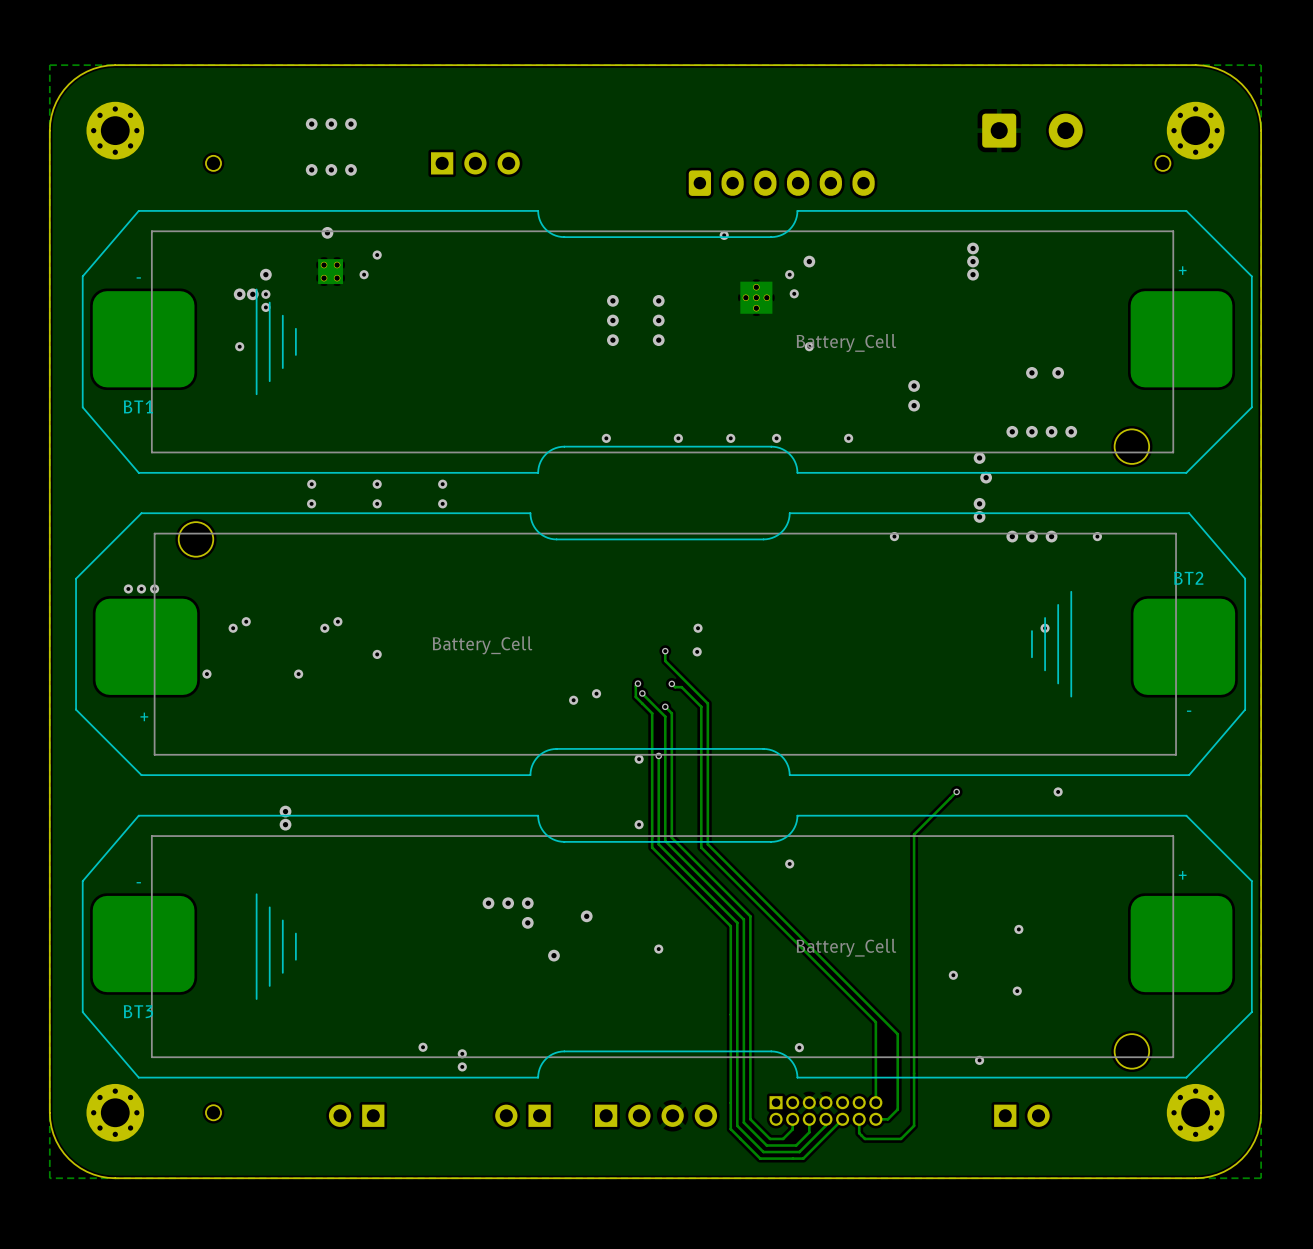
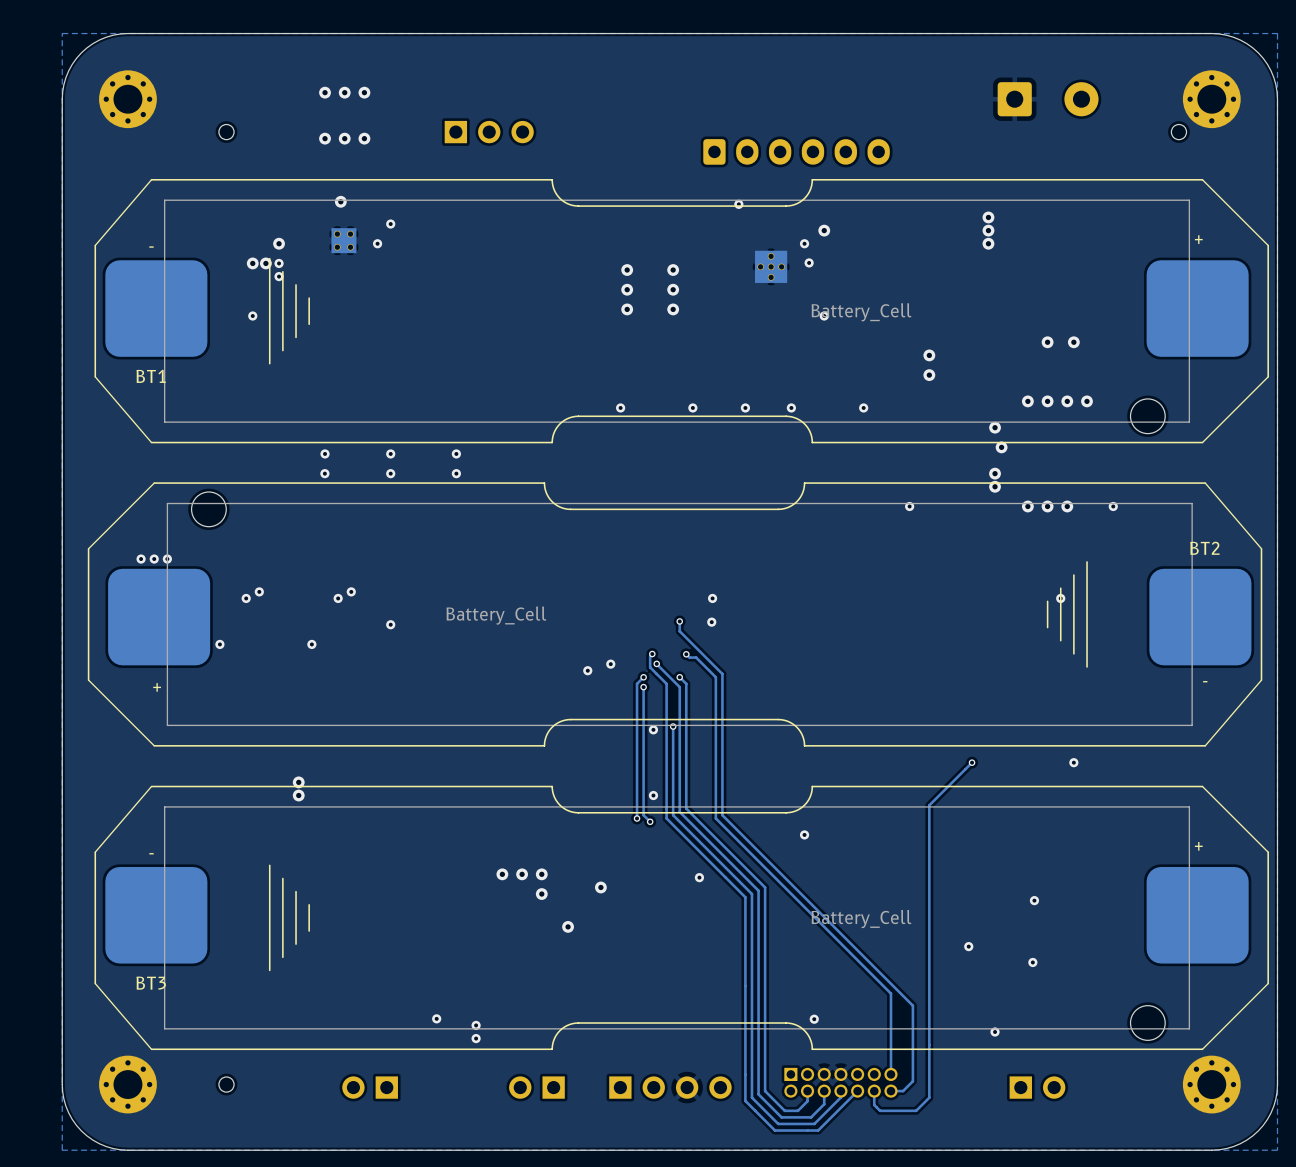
track: none -> (643, 677) (637, 683) (637, 818)
via: none -> (643, 677)
track: none -> (643, 687) (643, 815) (650, 821)
via: none -> (643, 687)
via: none -> (637, 818)
via: none -> (650, 821)
via position: (658, 949) -> (699, 877)

